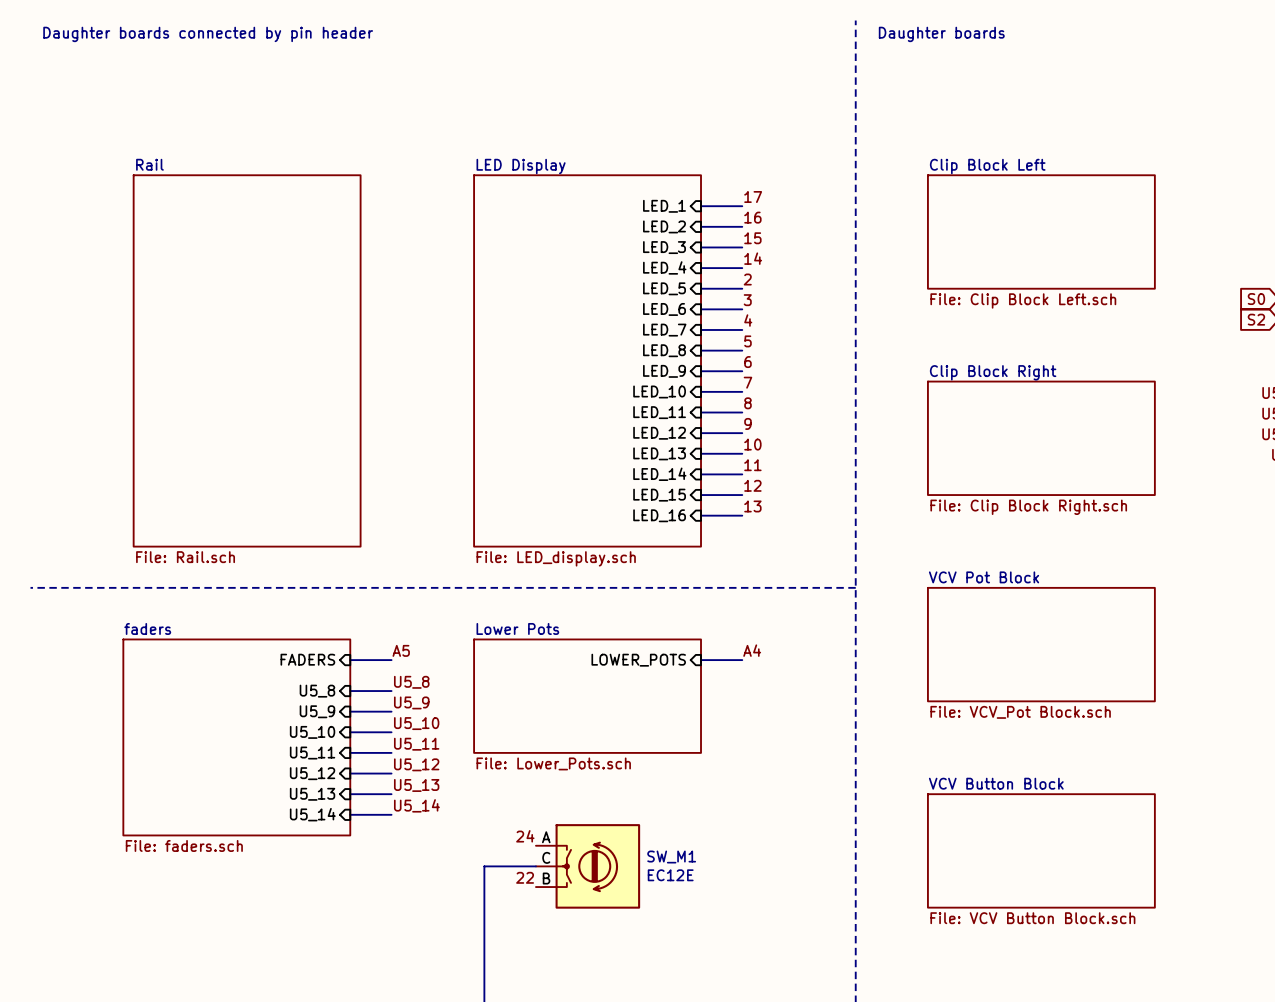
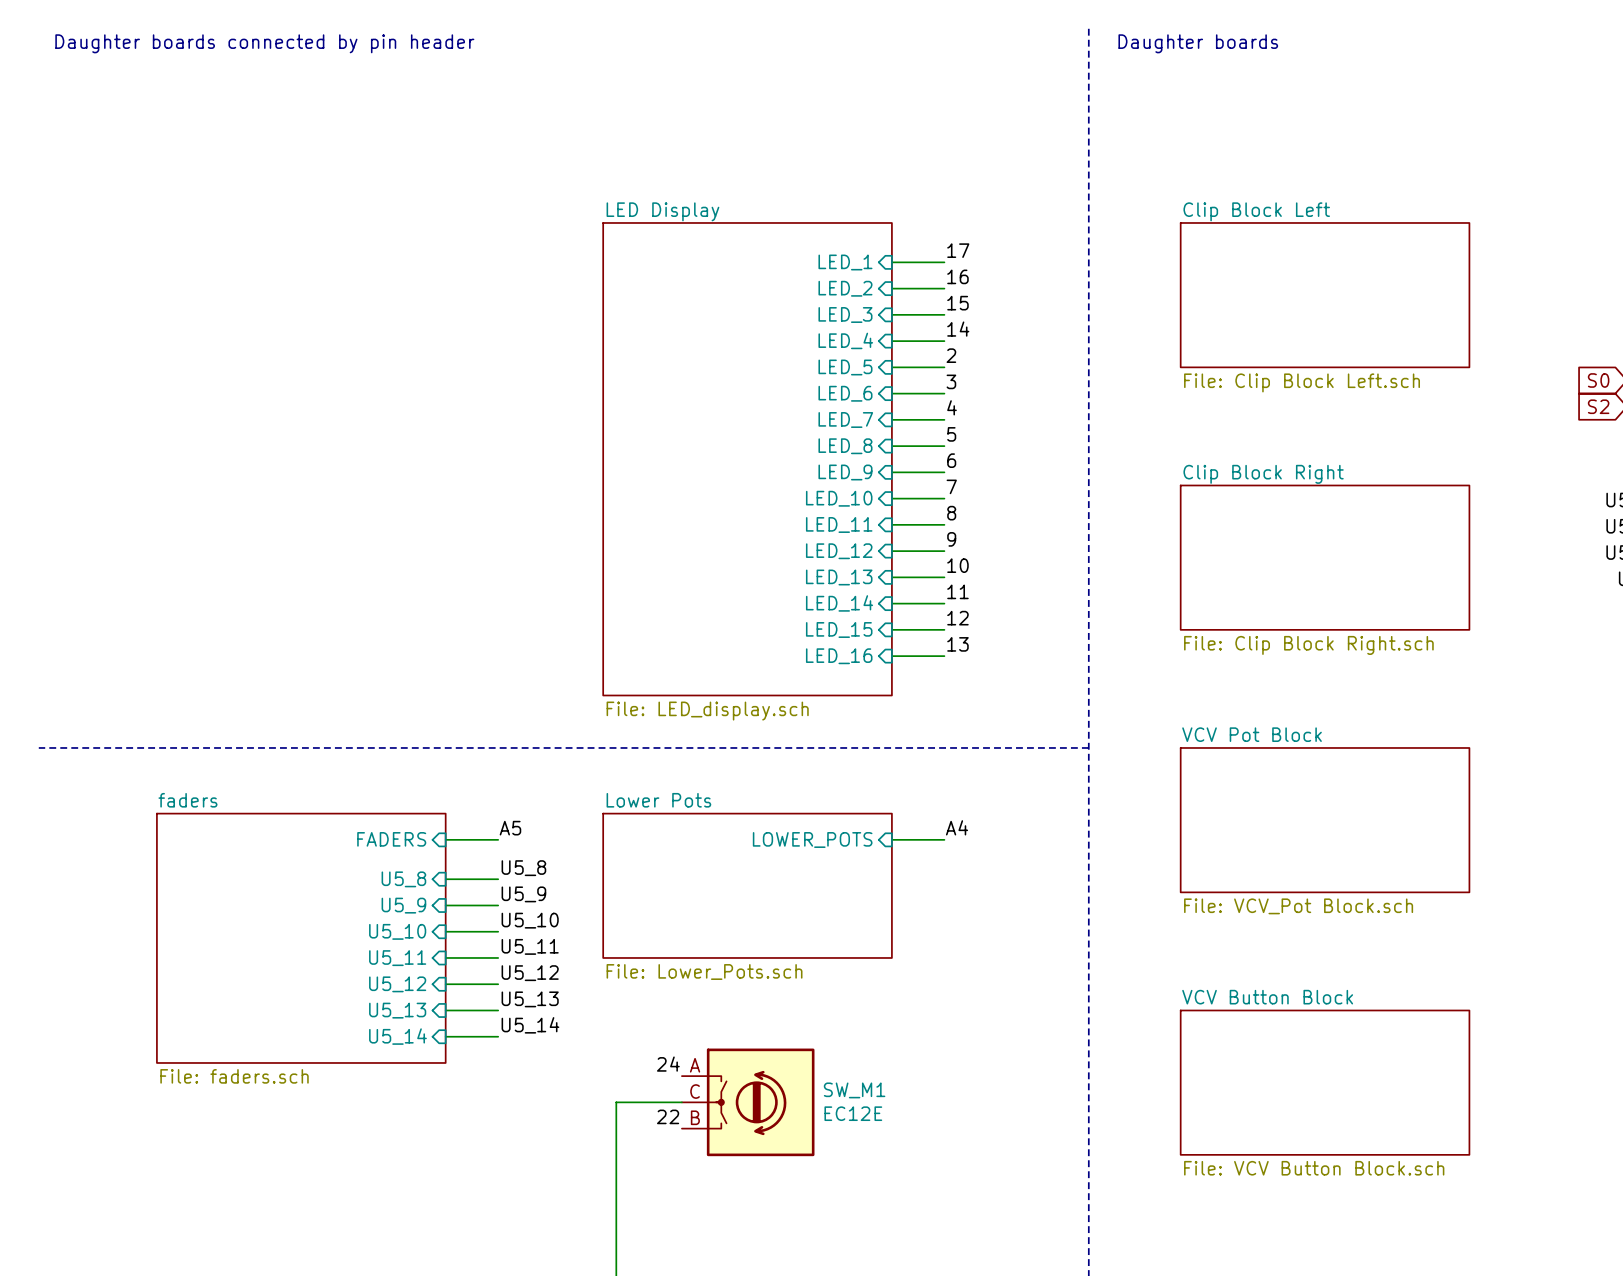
sheet Rail: File: Rail.sch (247, 360) -> none

